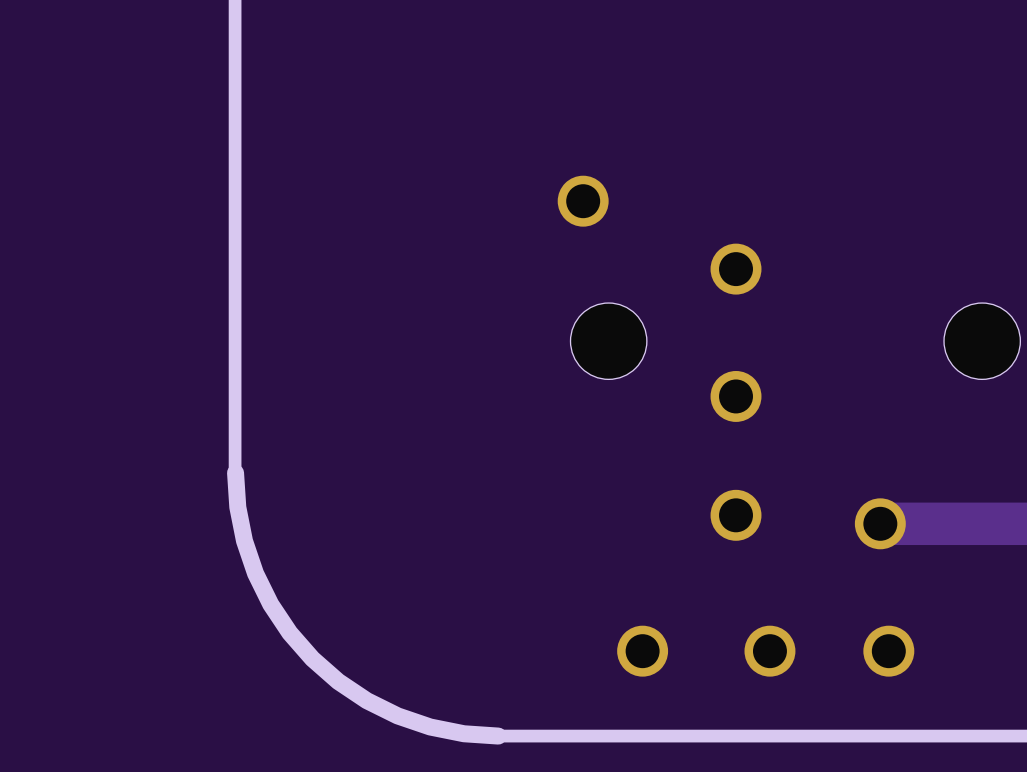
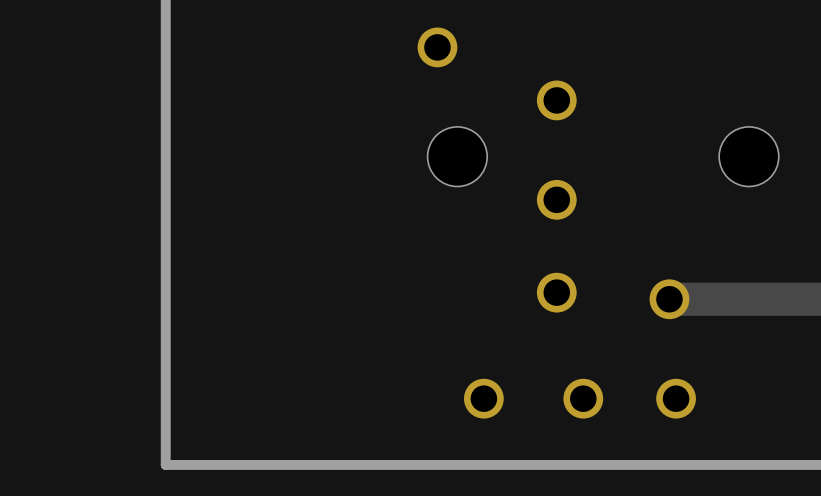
board edge: (235, 472) (237, 507) (244, 540) (255, 573) (270, 604) (289, 632) (312, 658) (338, 681) (366, 700) (397, 715) (430, 727) (463, 733) (498, 736) -> (165, 259) (165, 464) (371, 464)

